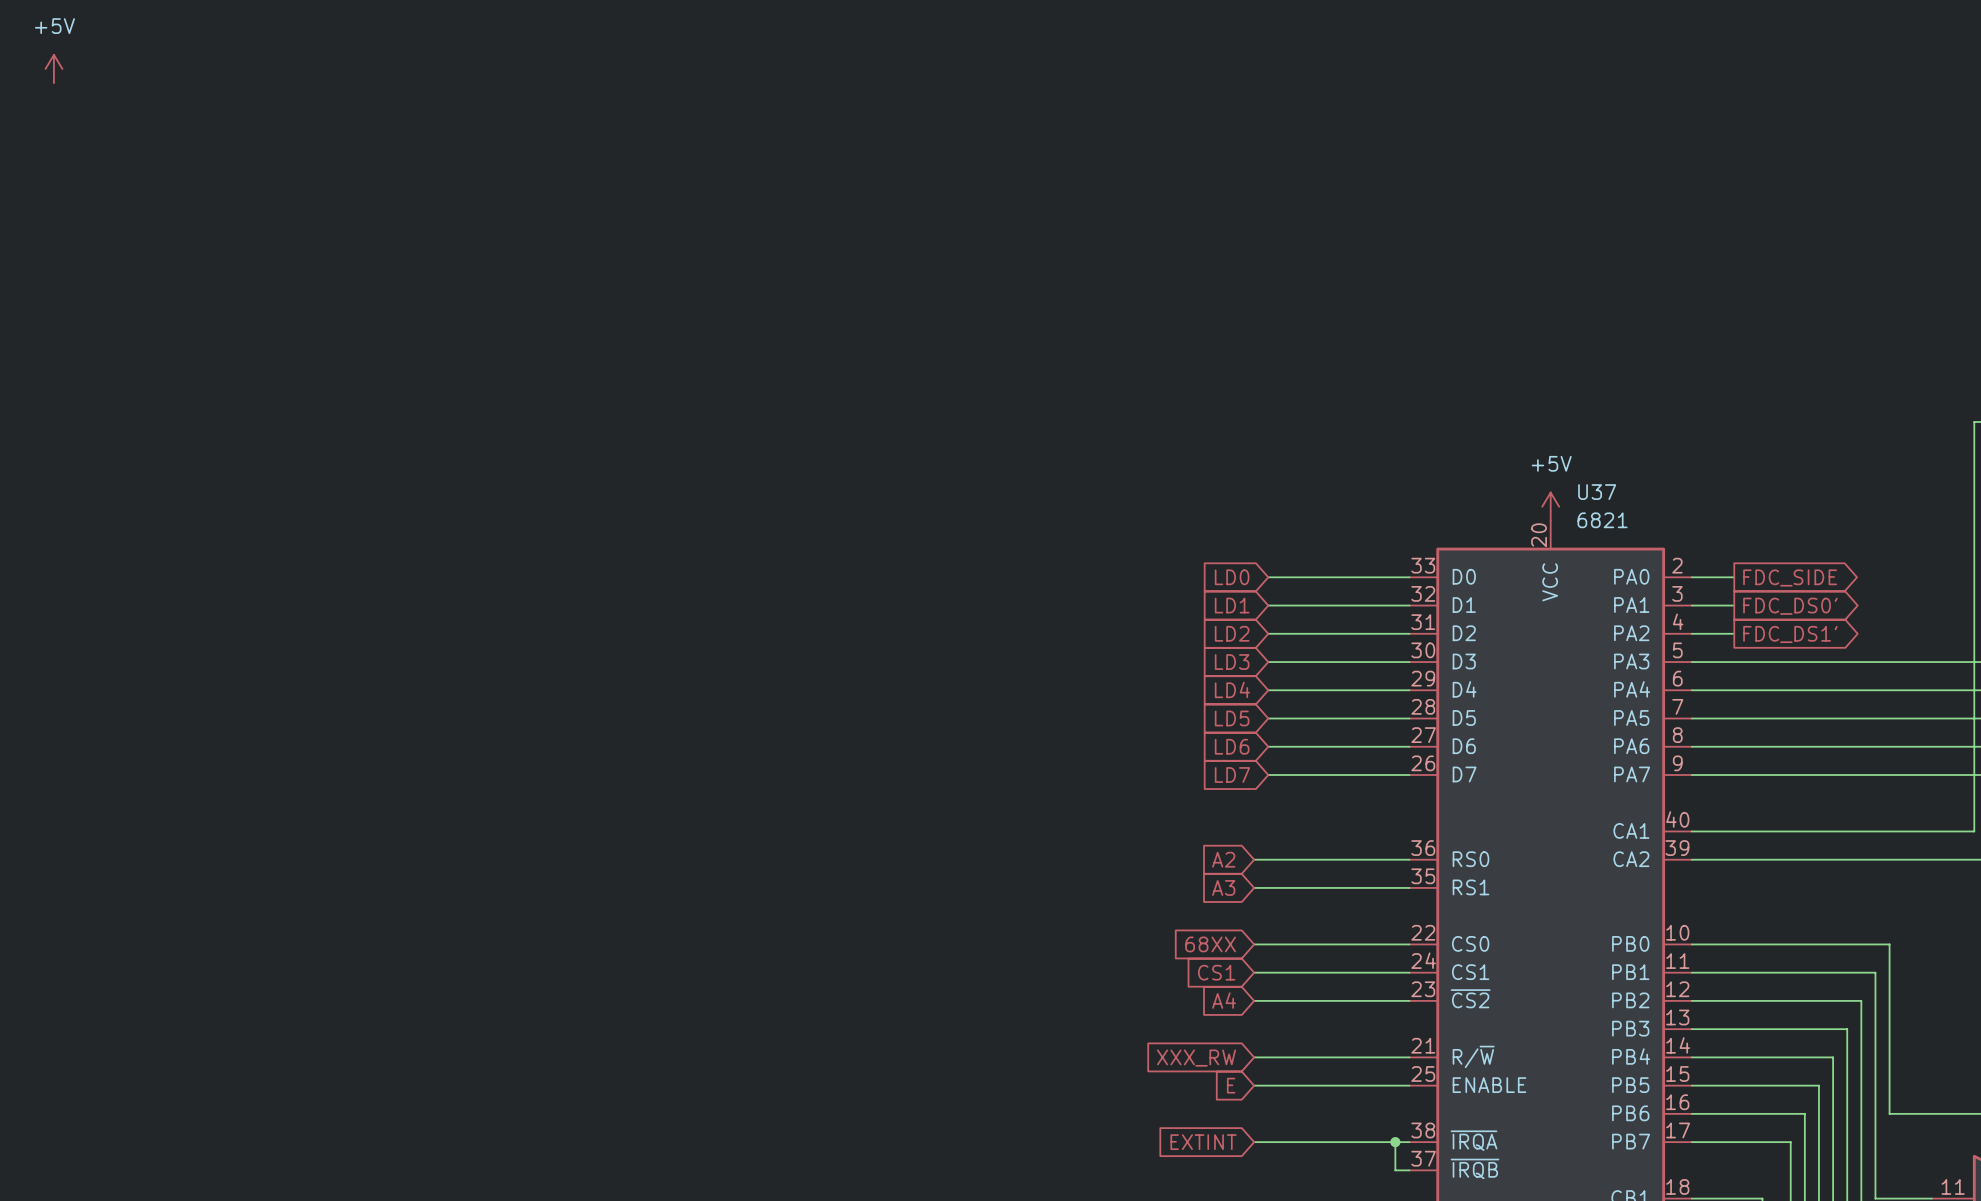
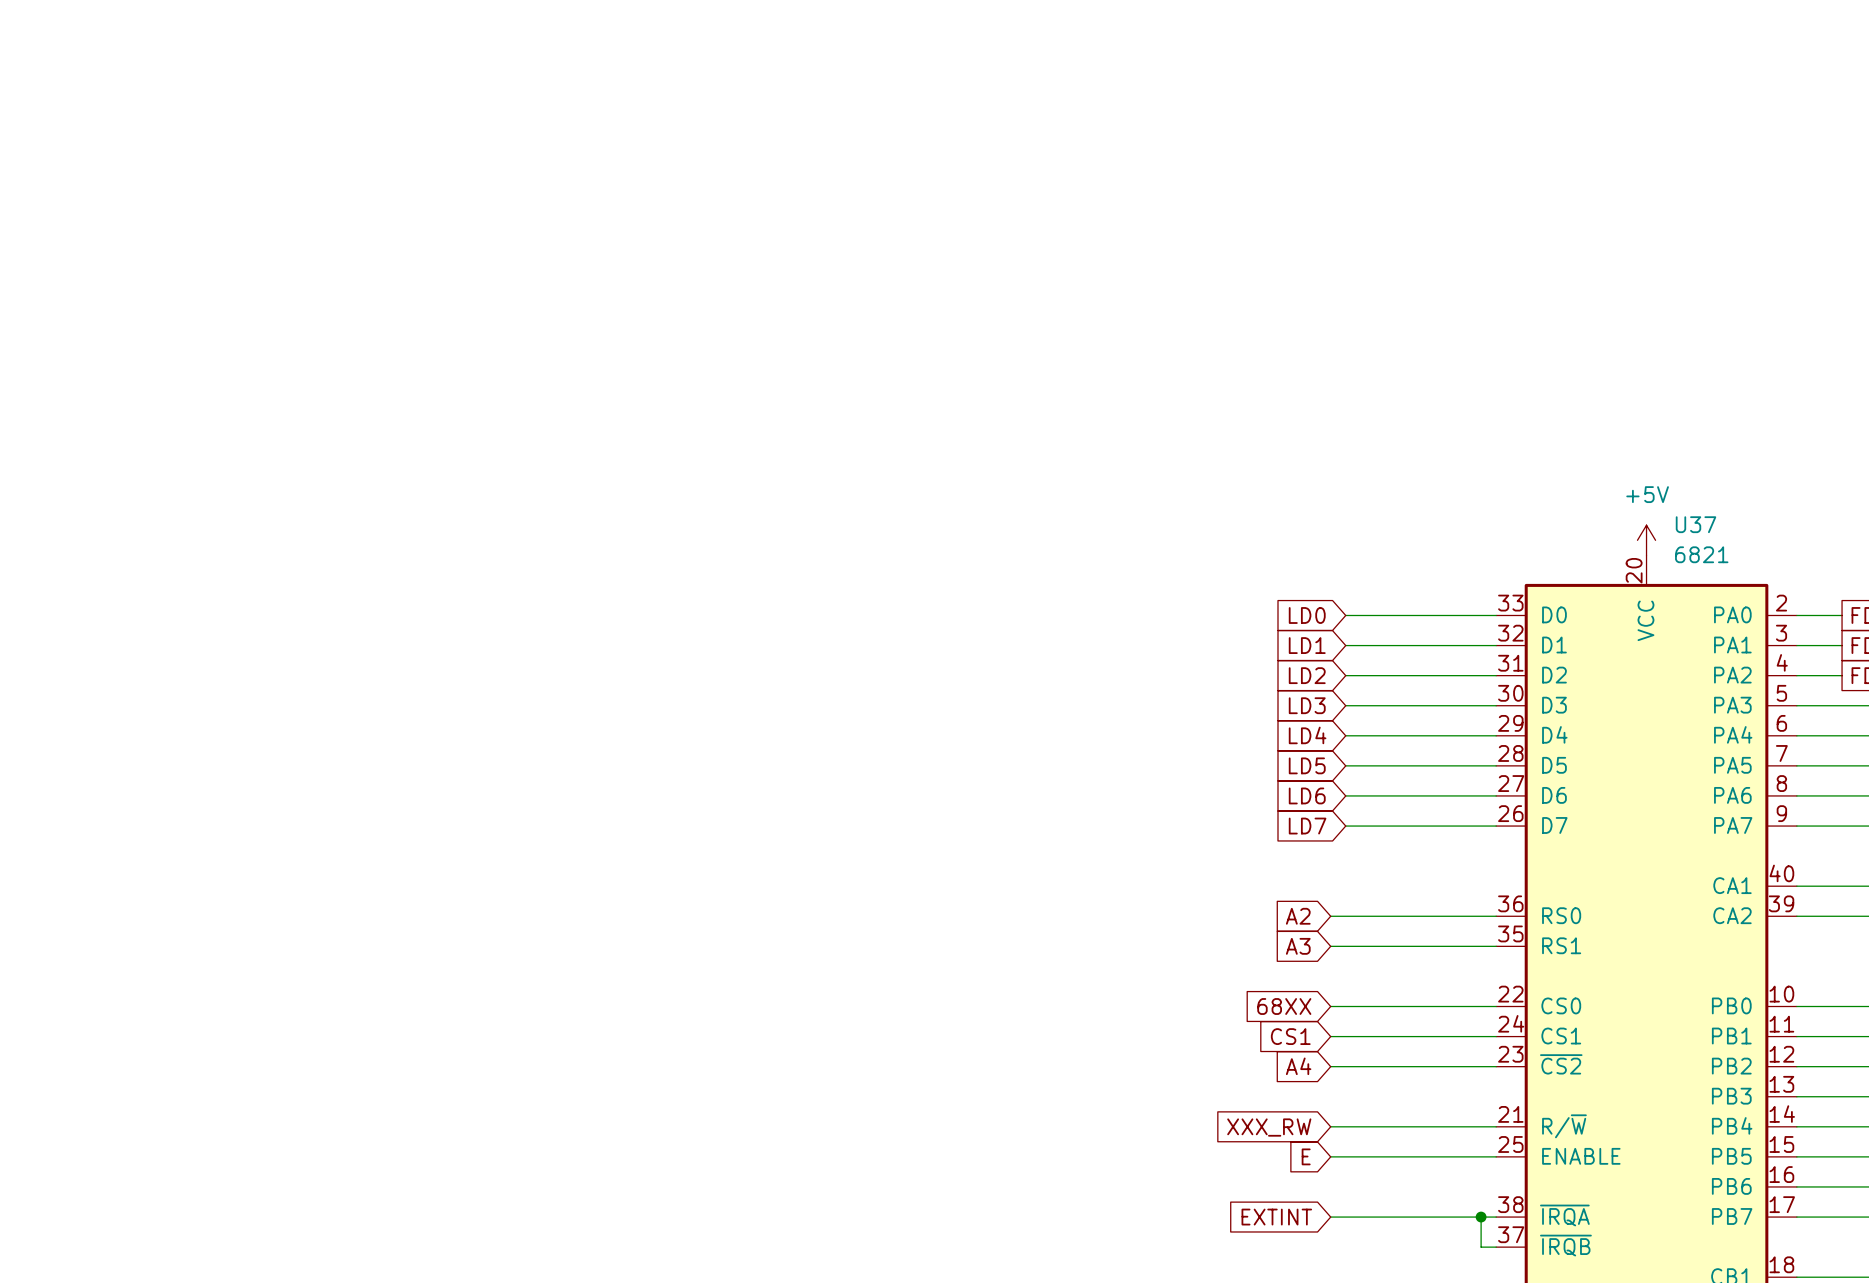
power symbol: +5V (53, 68) -> none

